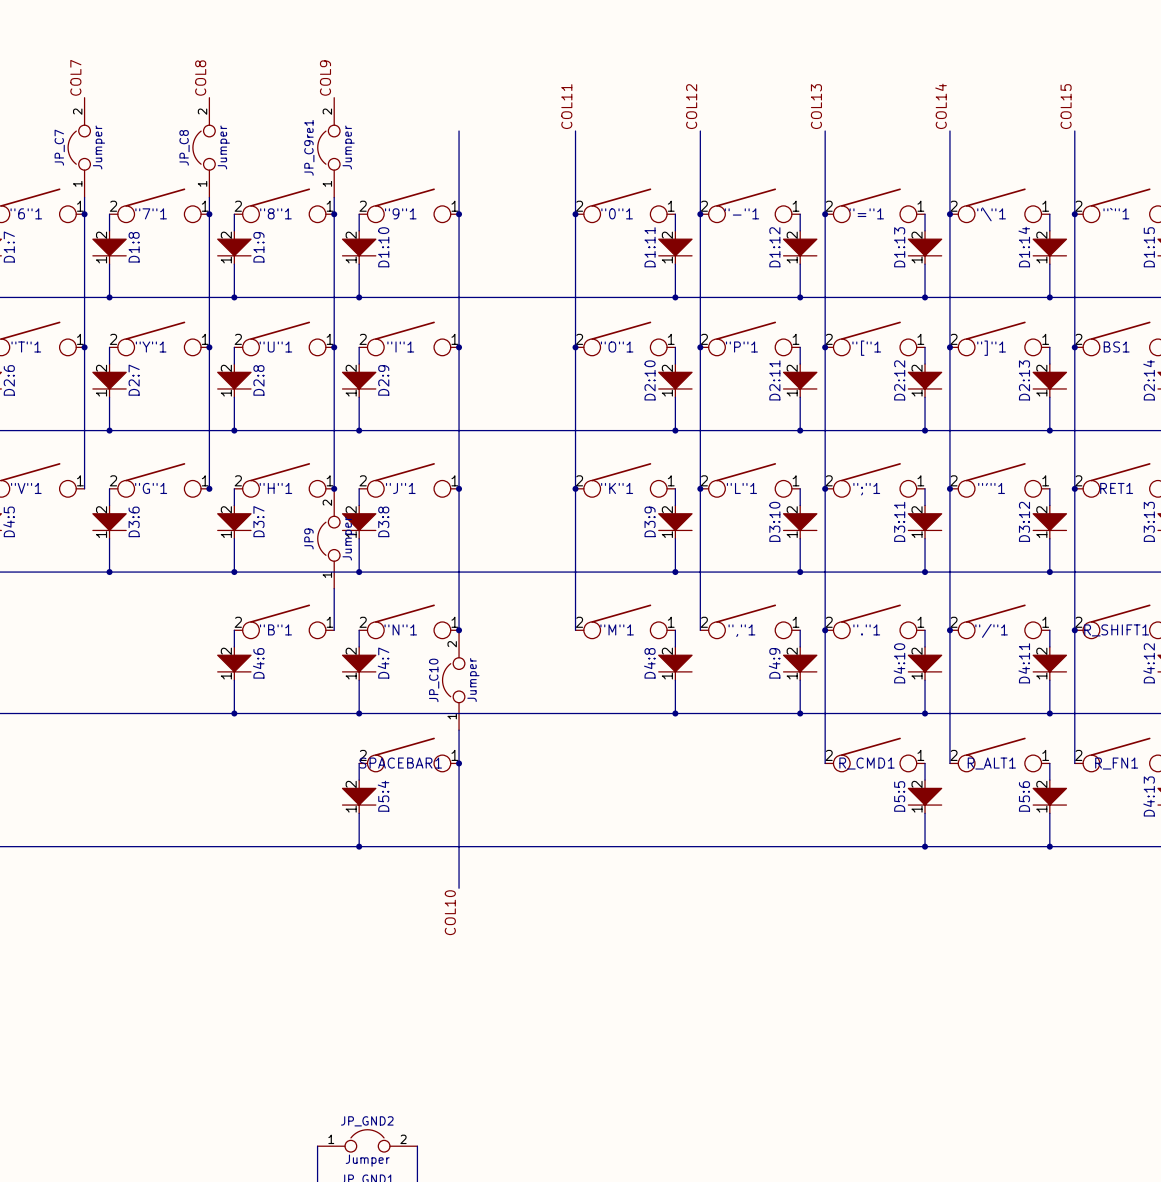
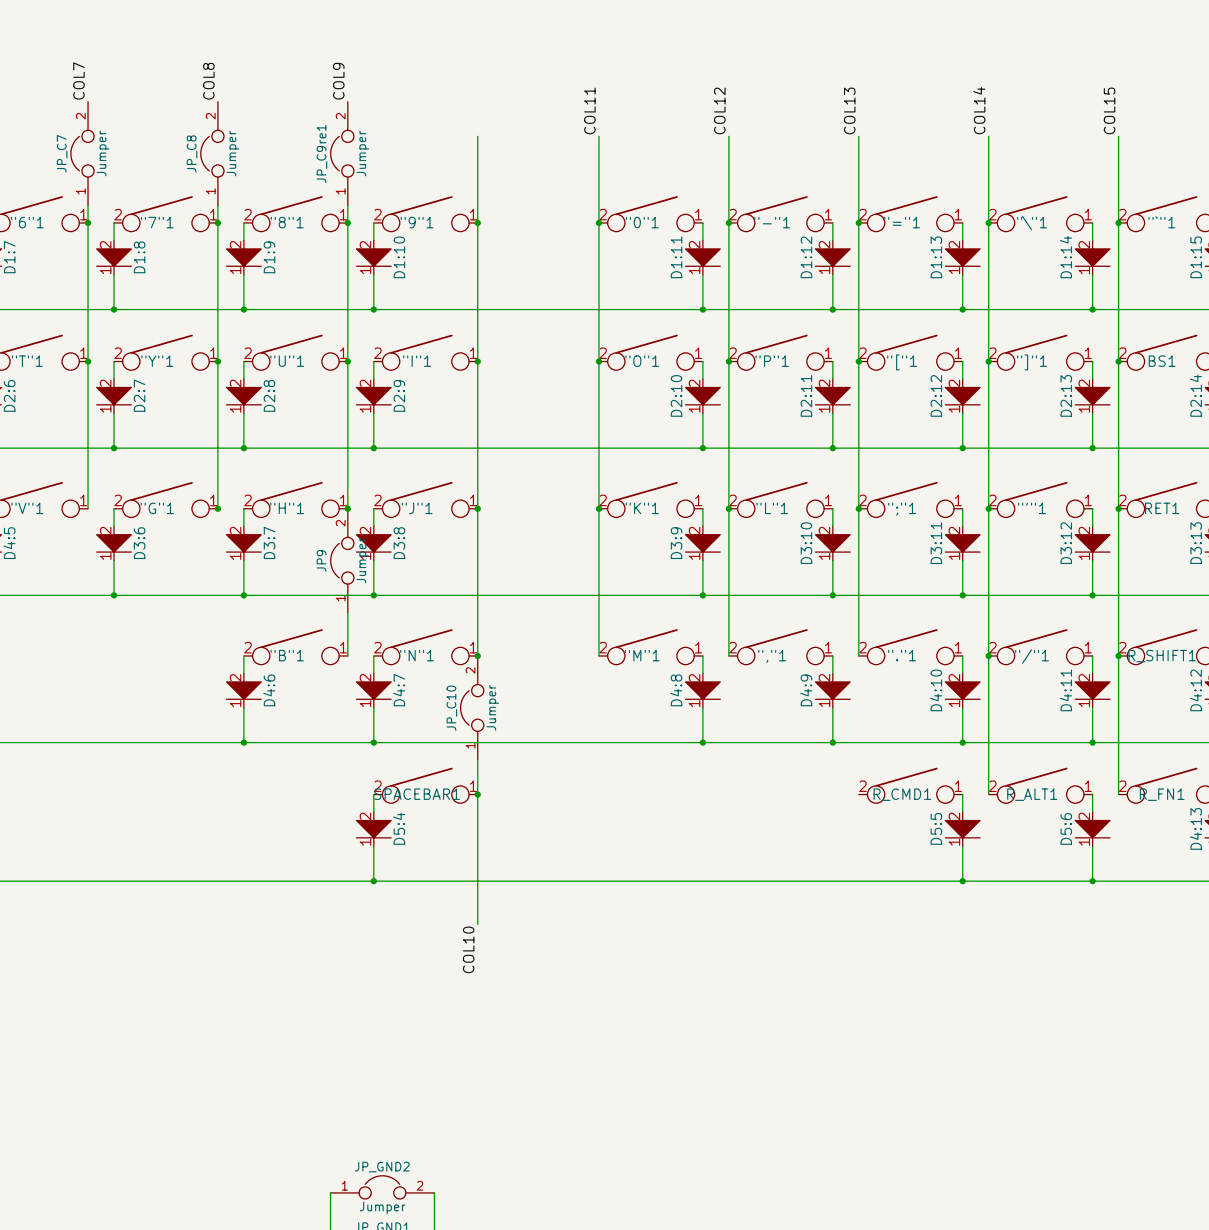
wire: (825, 630) (825, 763) -> none
junction: (825, 630) -> none

